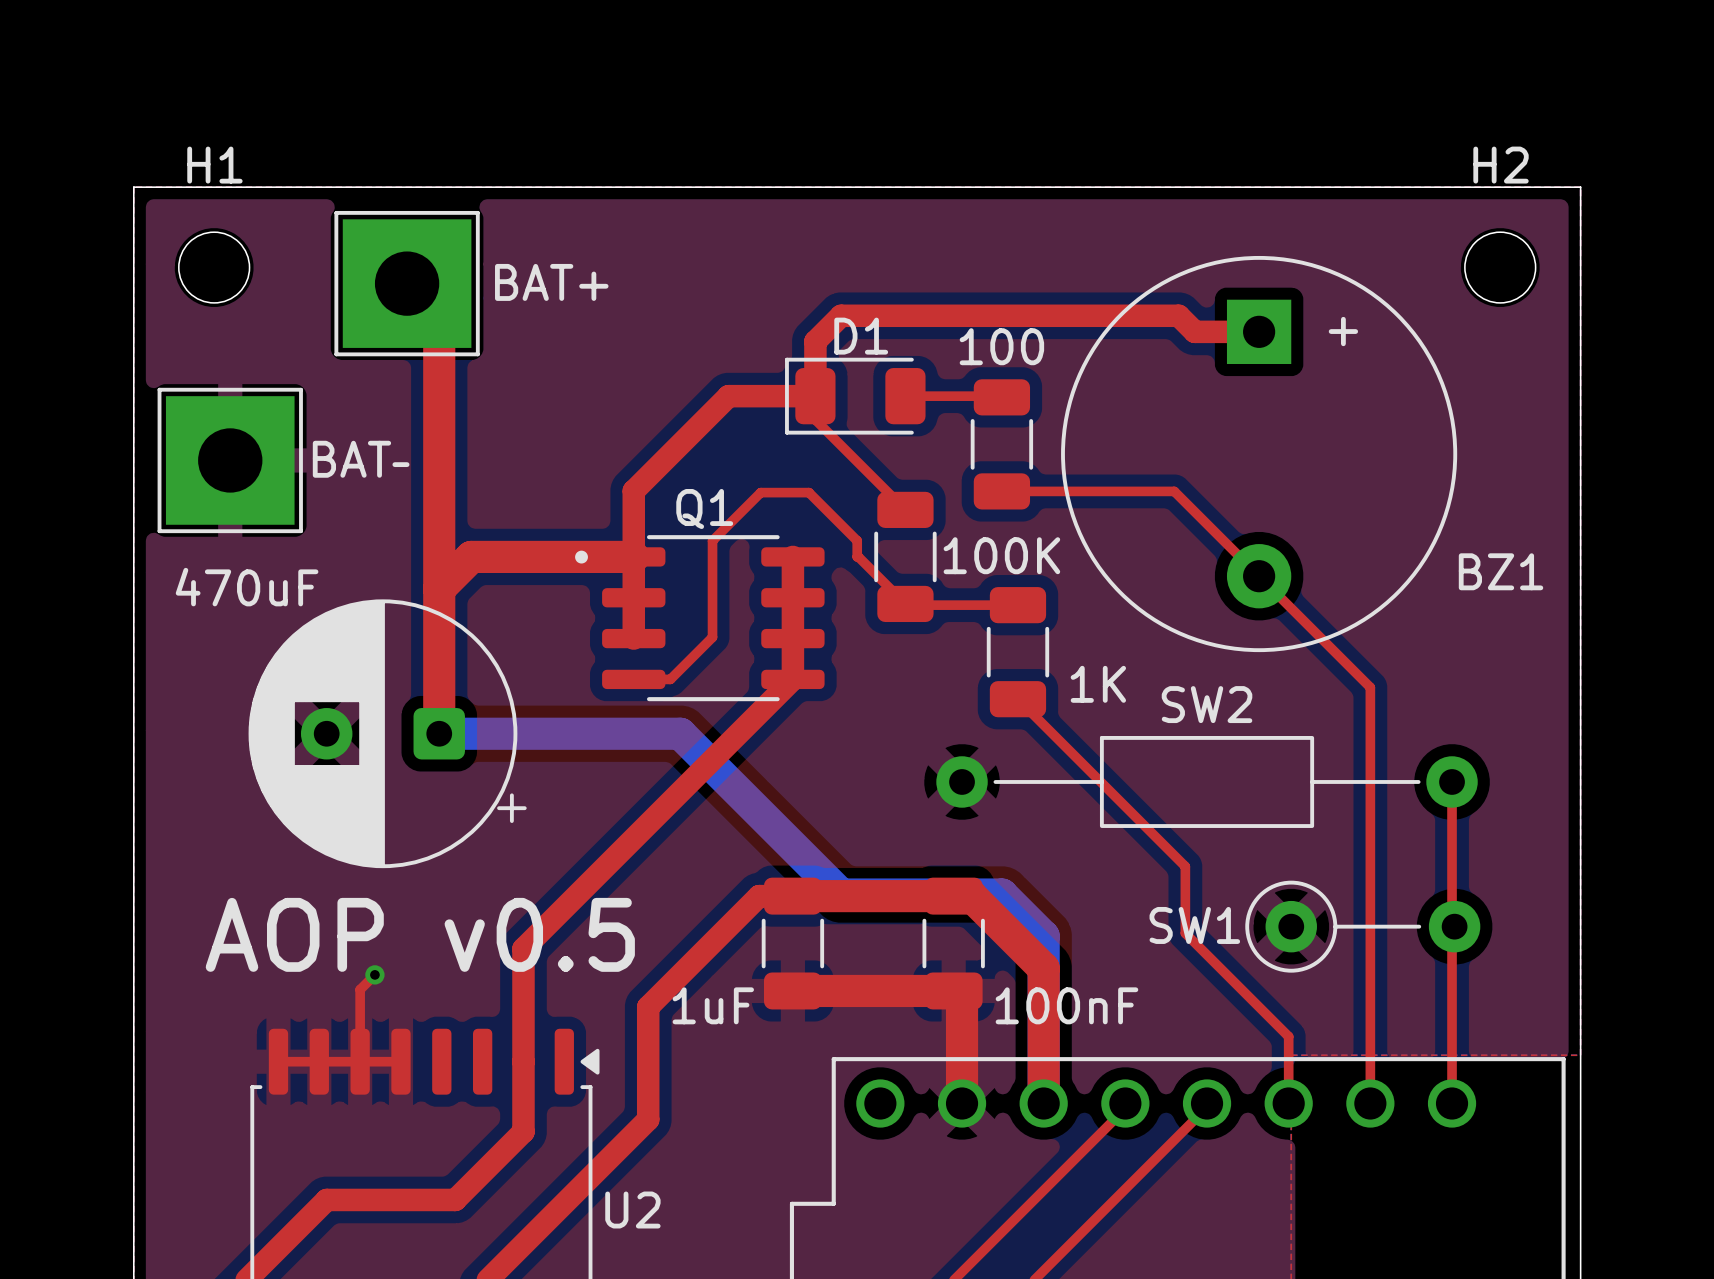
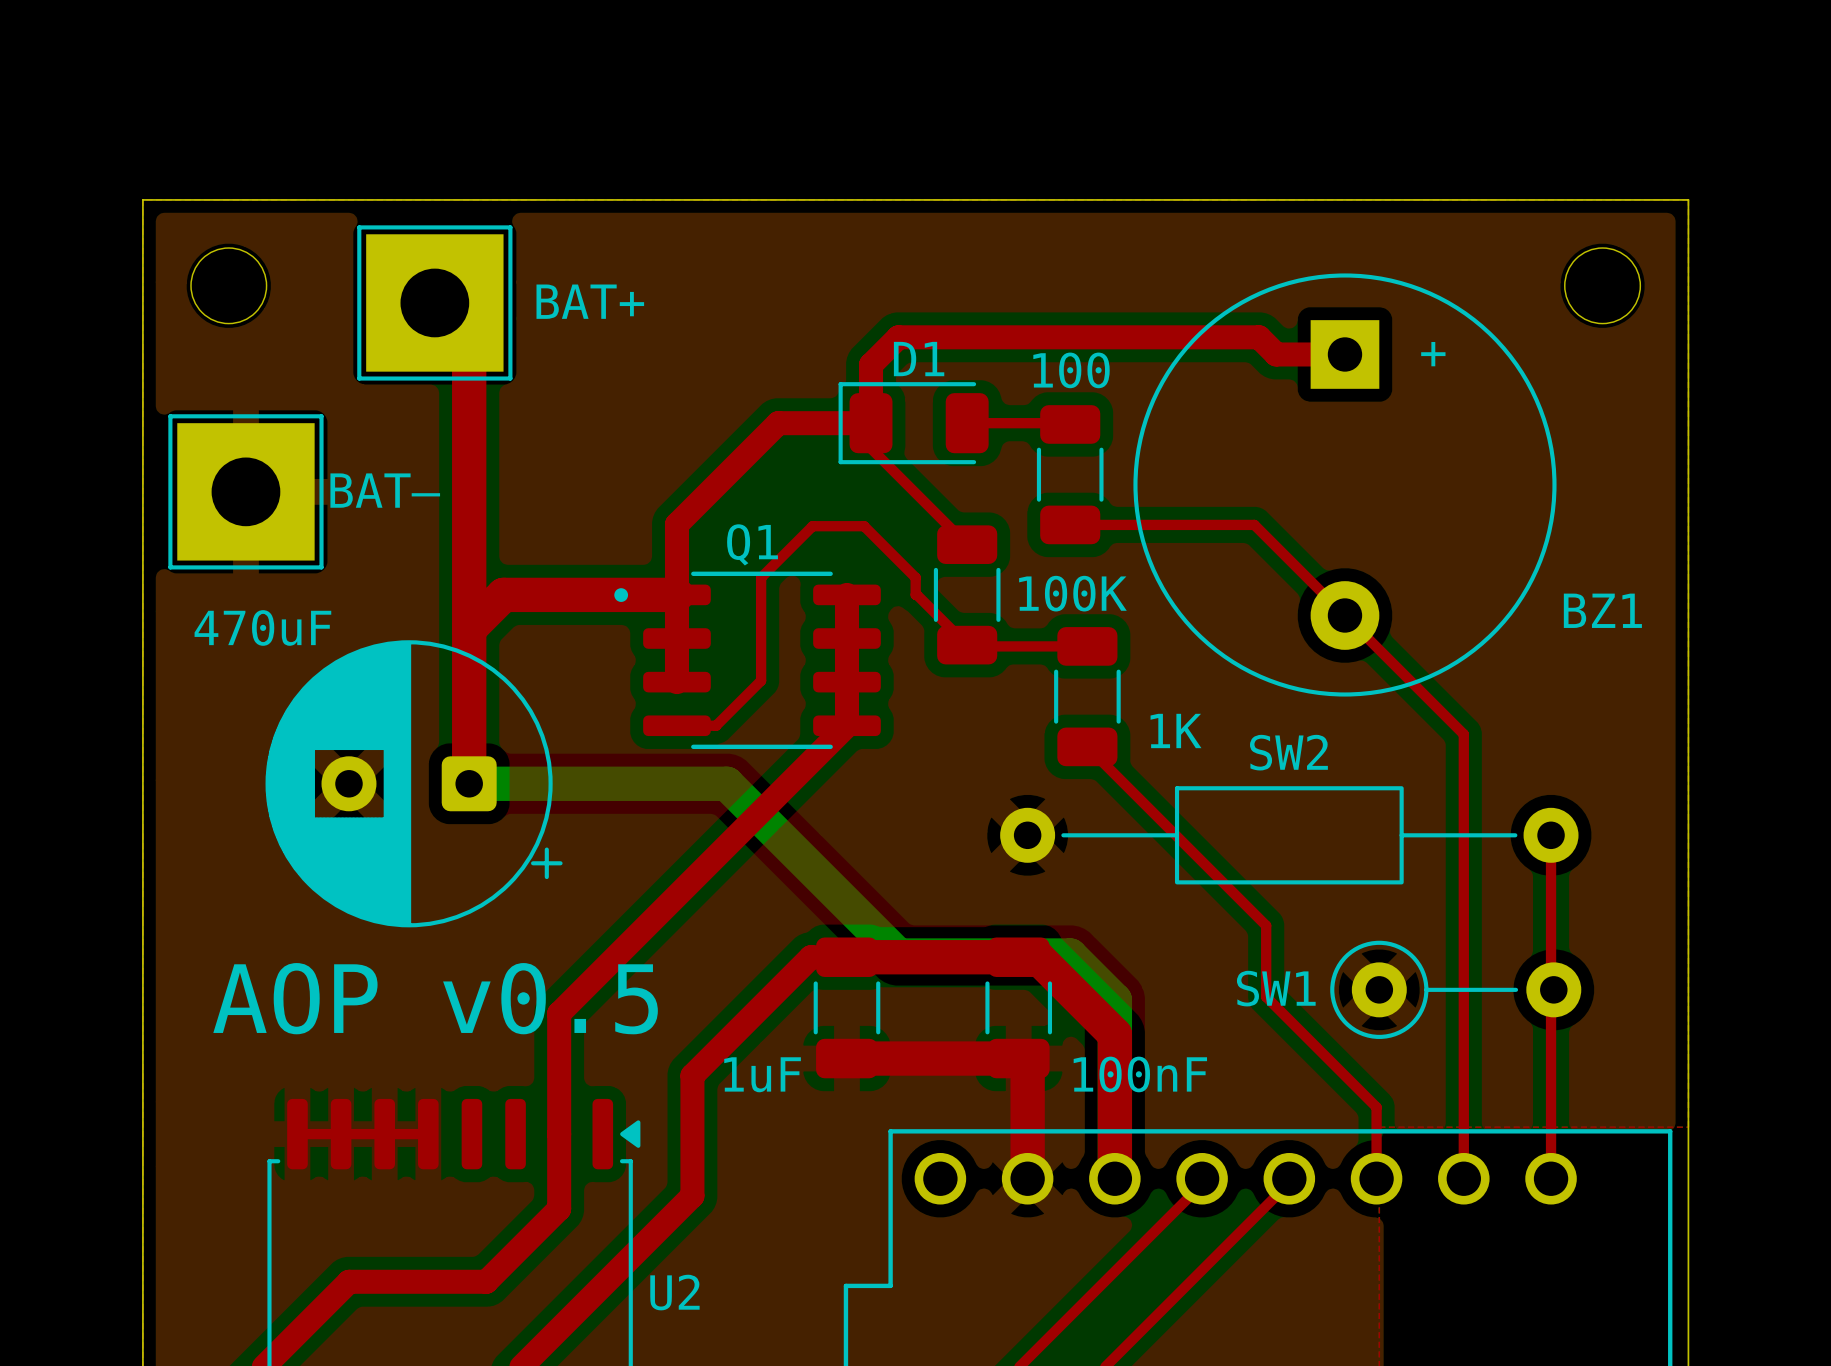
H1 name: H1 (214, 165) -> none
H2 name: H2 (1501, 165) -> none
top track: (374, 974) (360, 989) (360, 1061) -> none
via: (374, 974) -> none

